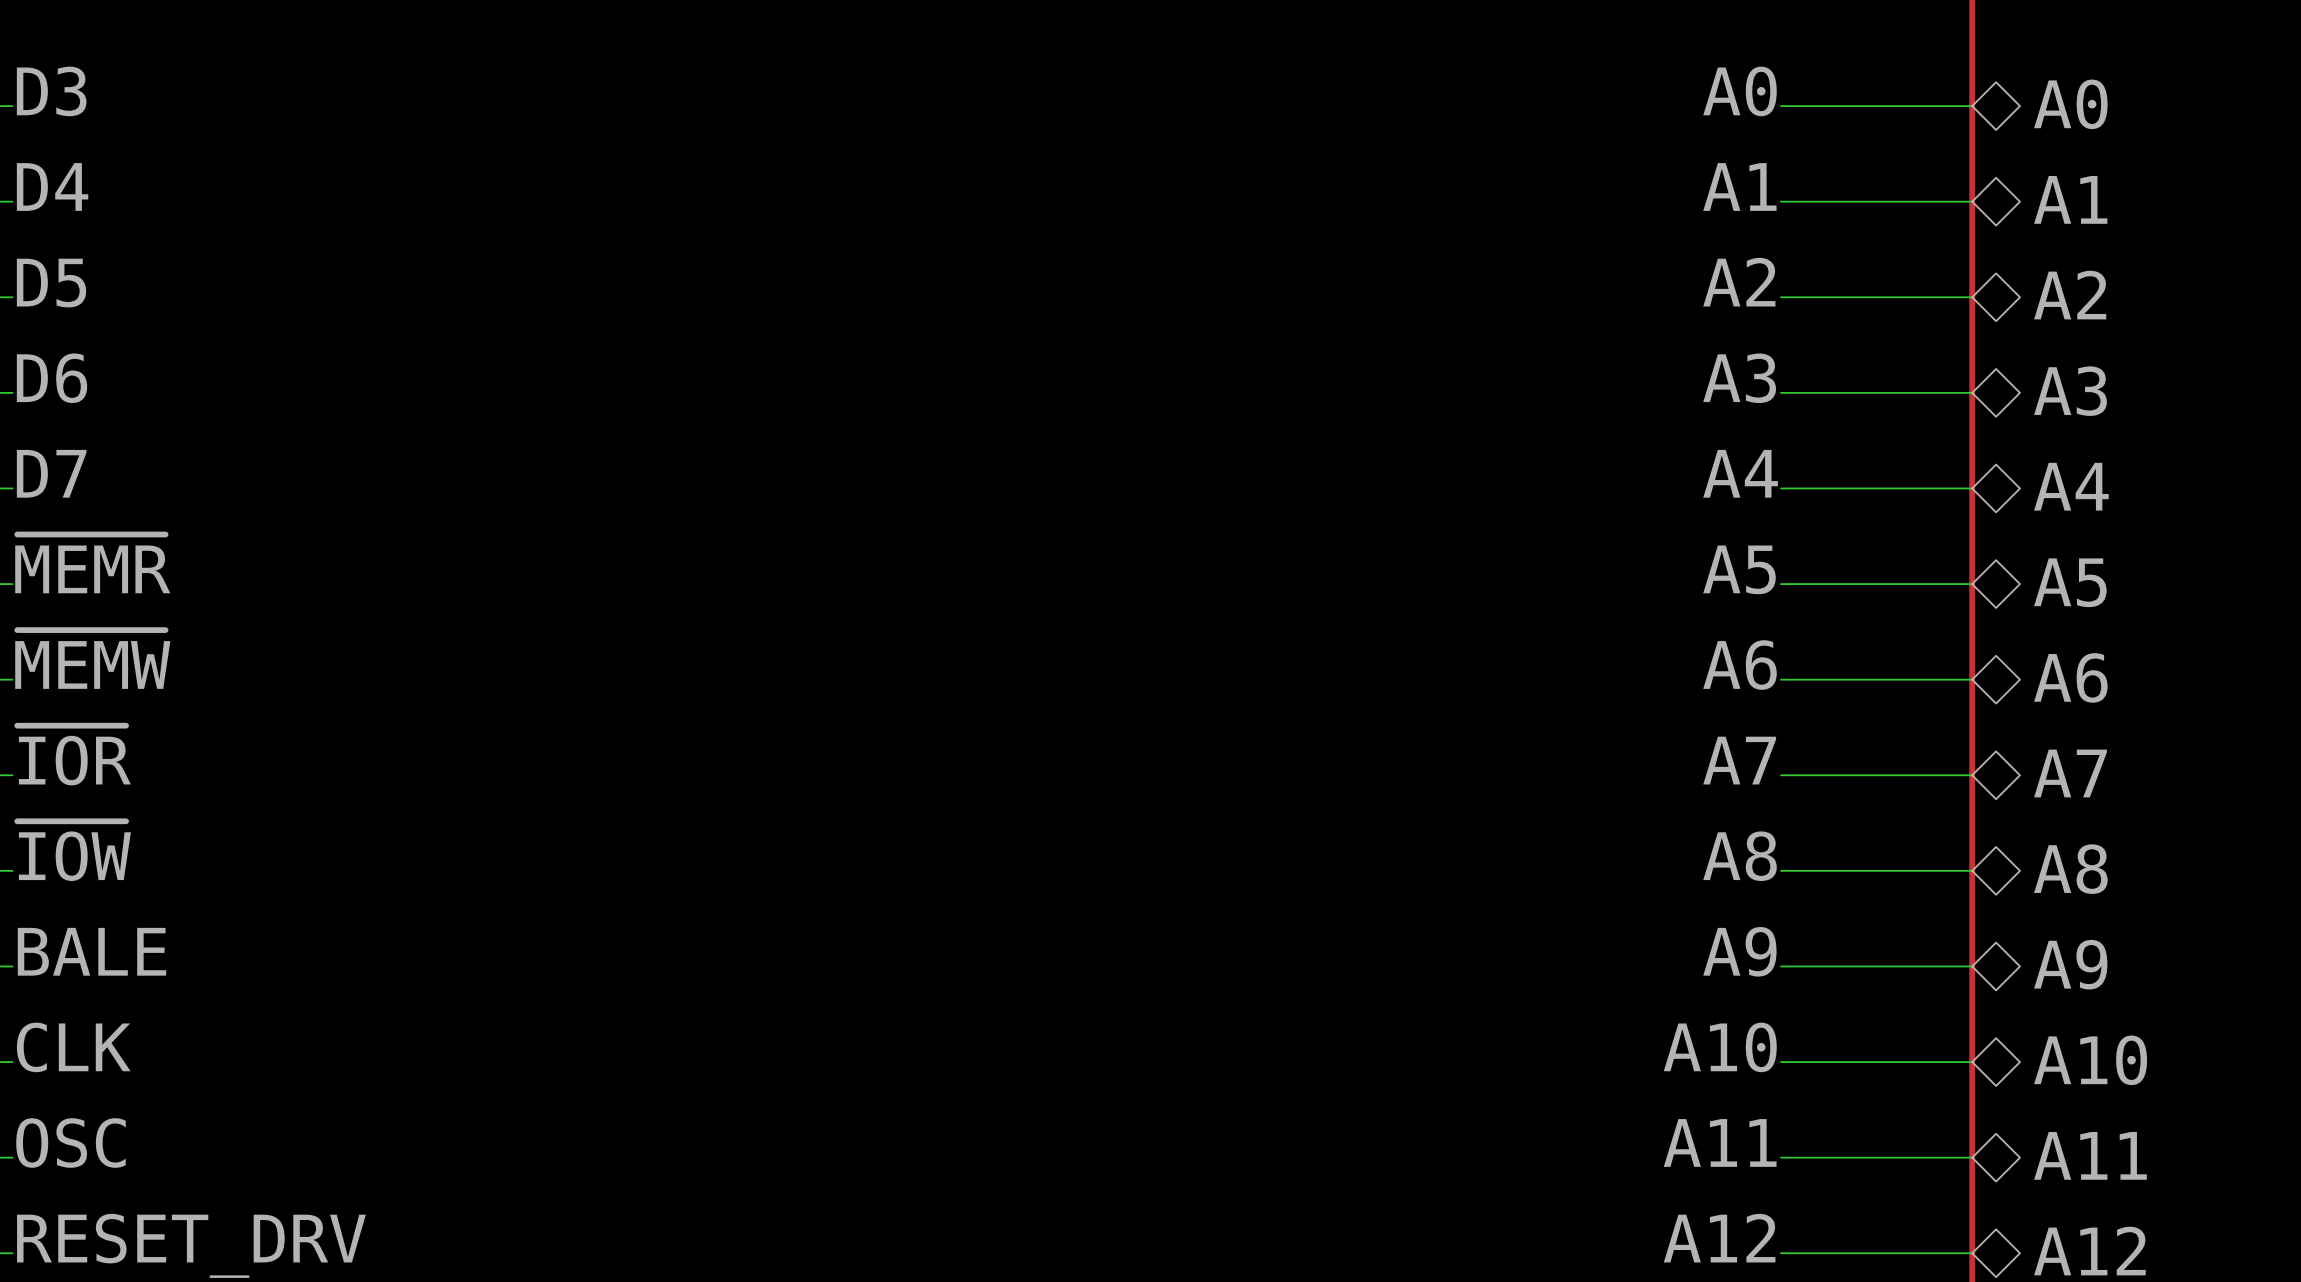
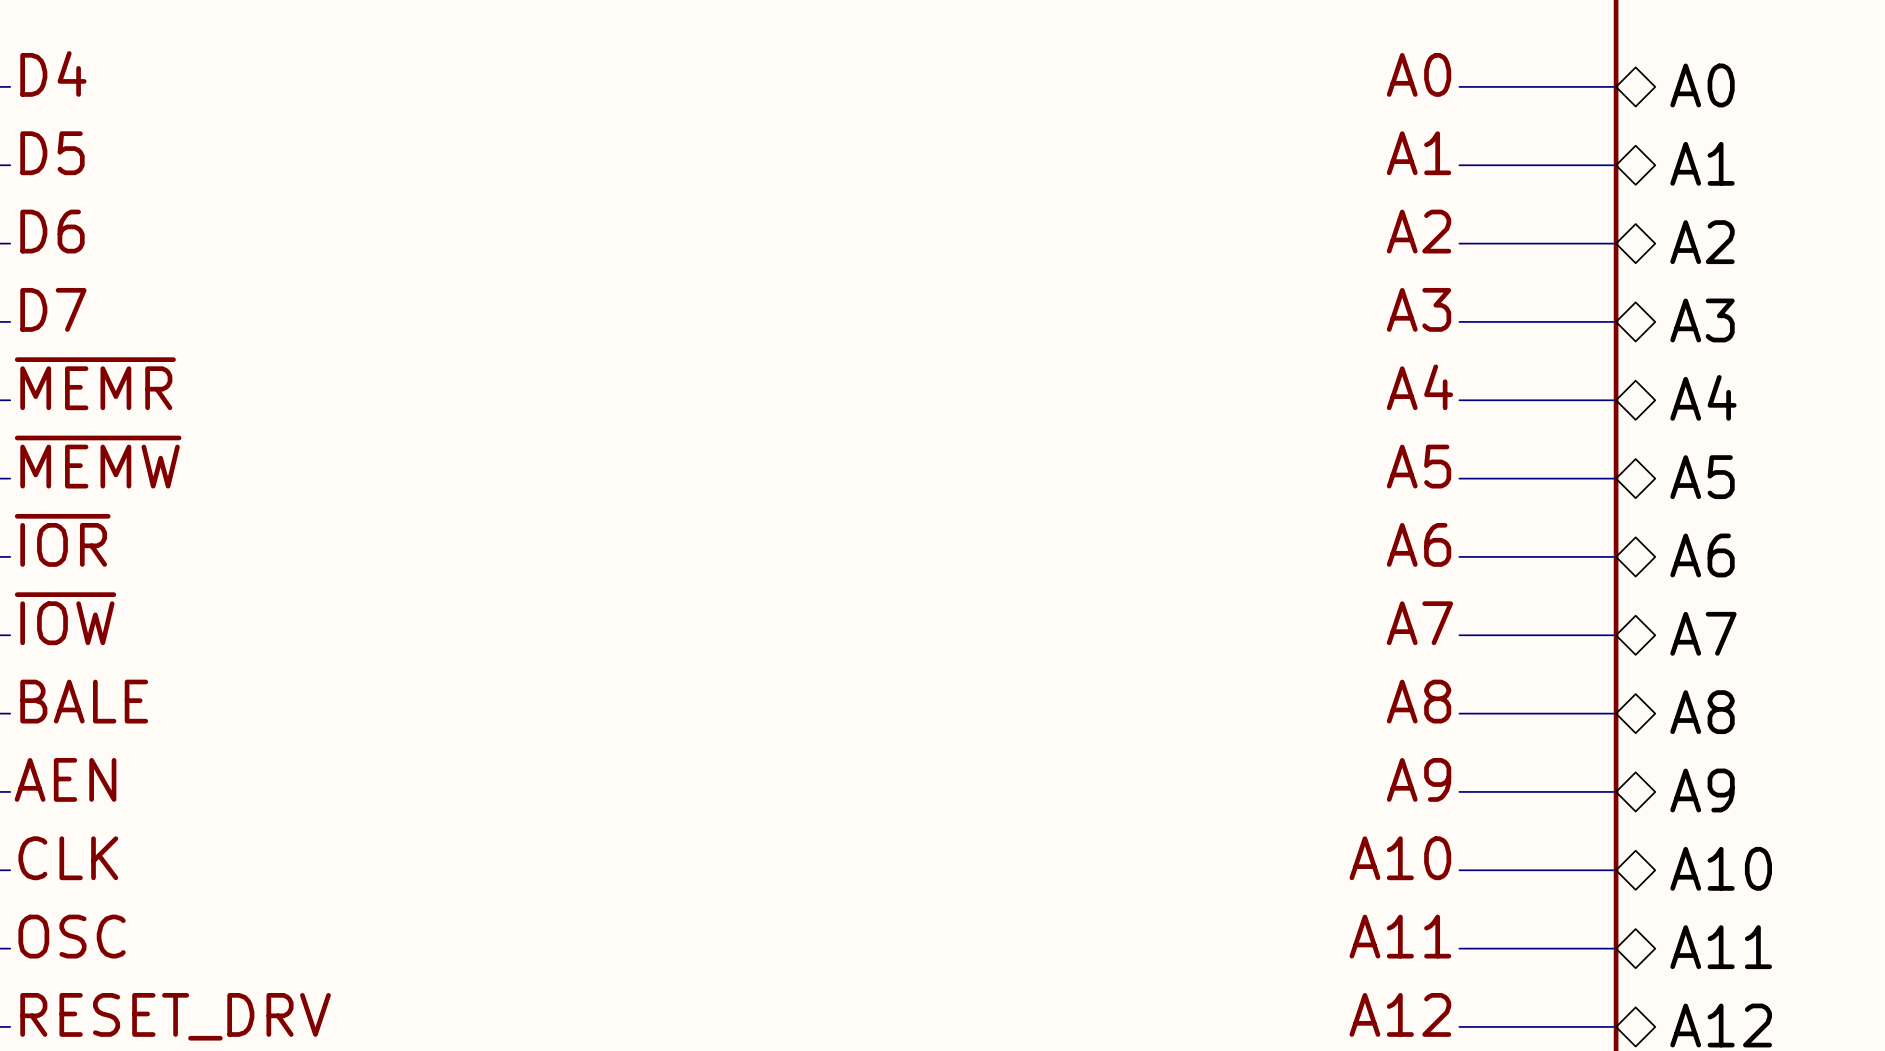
label: D3 (51, 91) -> D4 (53, 73)
label: D4 (52, 186) -> D5 (52, 153)
label: D5 (51, 283) -> D6 (52, 231)
label: D6 (52, 378) -> D7 (53, 309)
label: D7 (51, 473) -> ~{MEMR} (95, 383)
label: ~{MEMR} (92, 563) -> ~{MEMW} (98, 462)
label: ~{MEMW} (92, 659) -> ~{IOR} (62, 540)
label: ~{IOR} (74, 755) -> ~{IOW} (65, 618)
label: ~{IOW} (74, 851) -> BALE (84, 701)
label: BALE (91, 951) -> AEN (65, 779)

